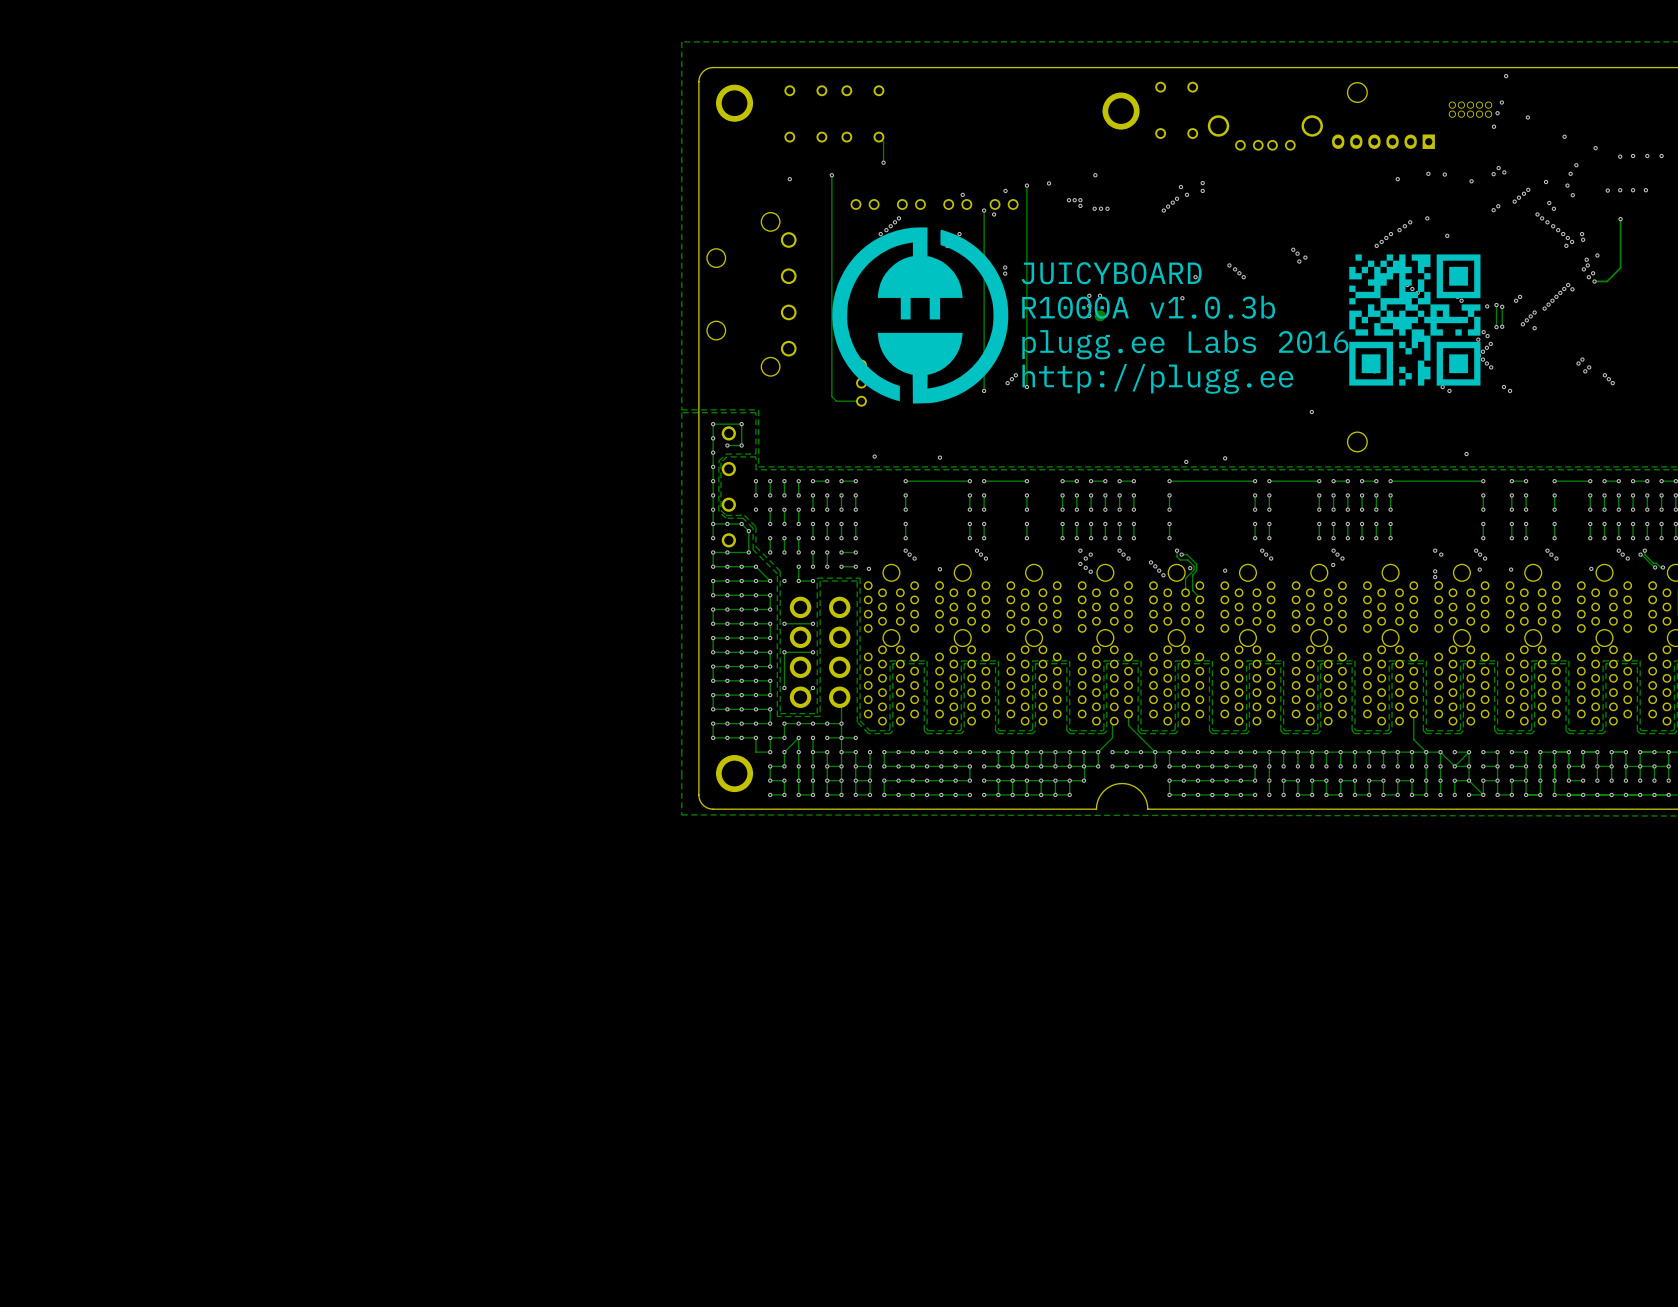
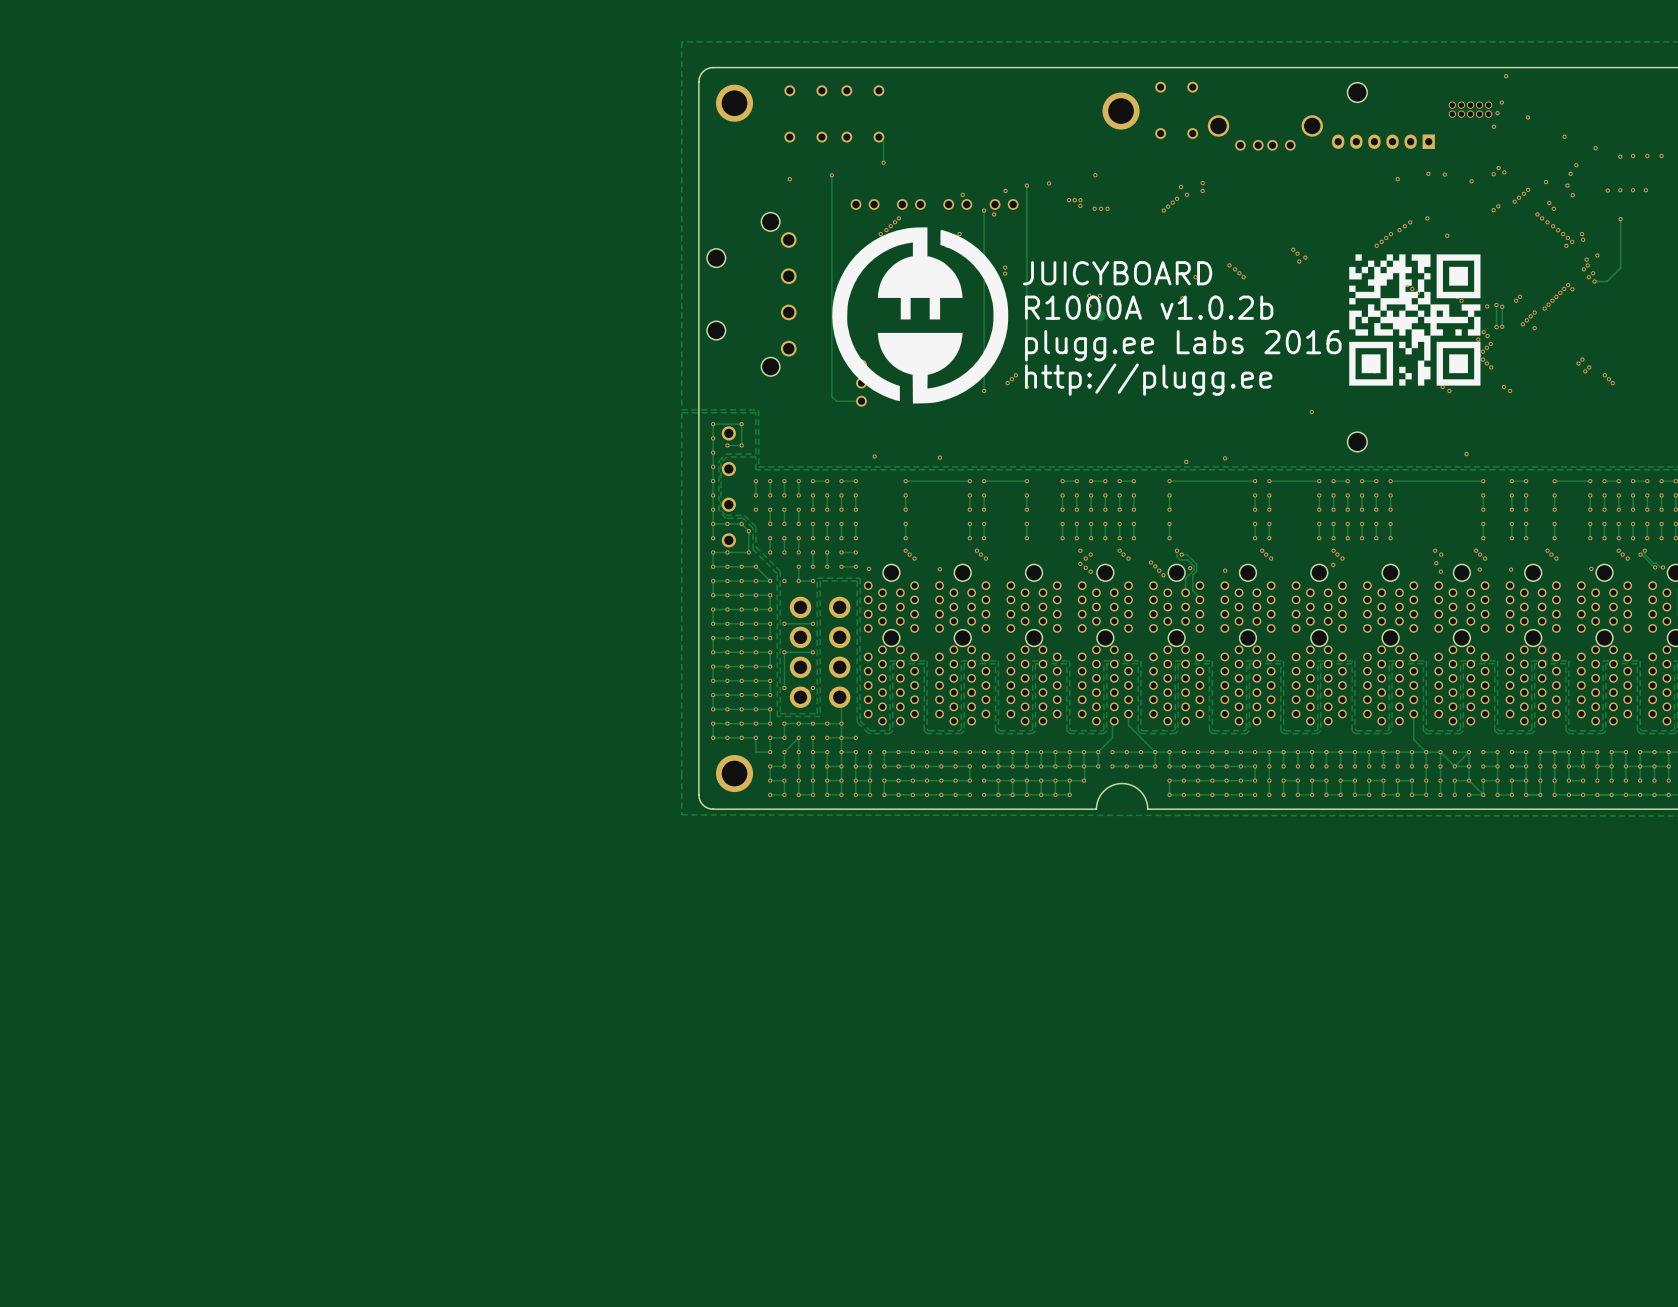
text: R1000A v1.0.3b (1148, 307) -> R1000A v1.0.2b (1149, 307)
via: none -> (1436, 563)
via: (1435, 571) -> none
via: none -> (1440, 571)
via: (1435, 577) -> none

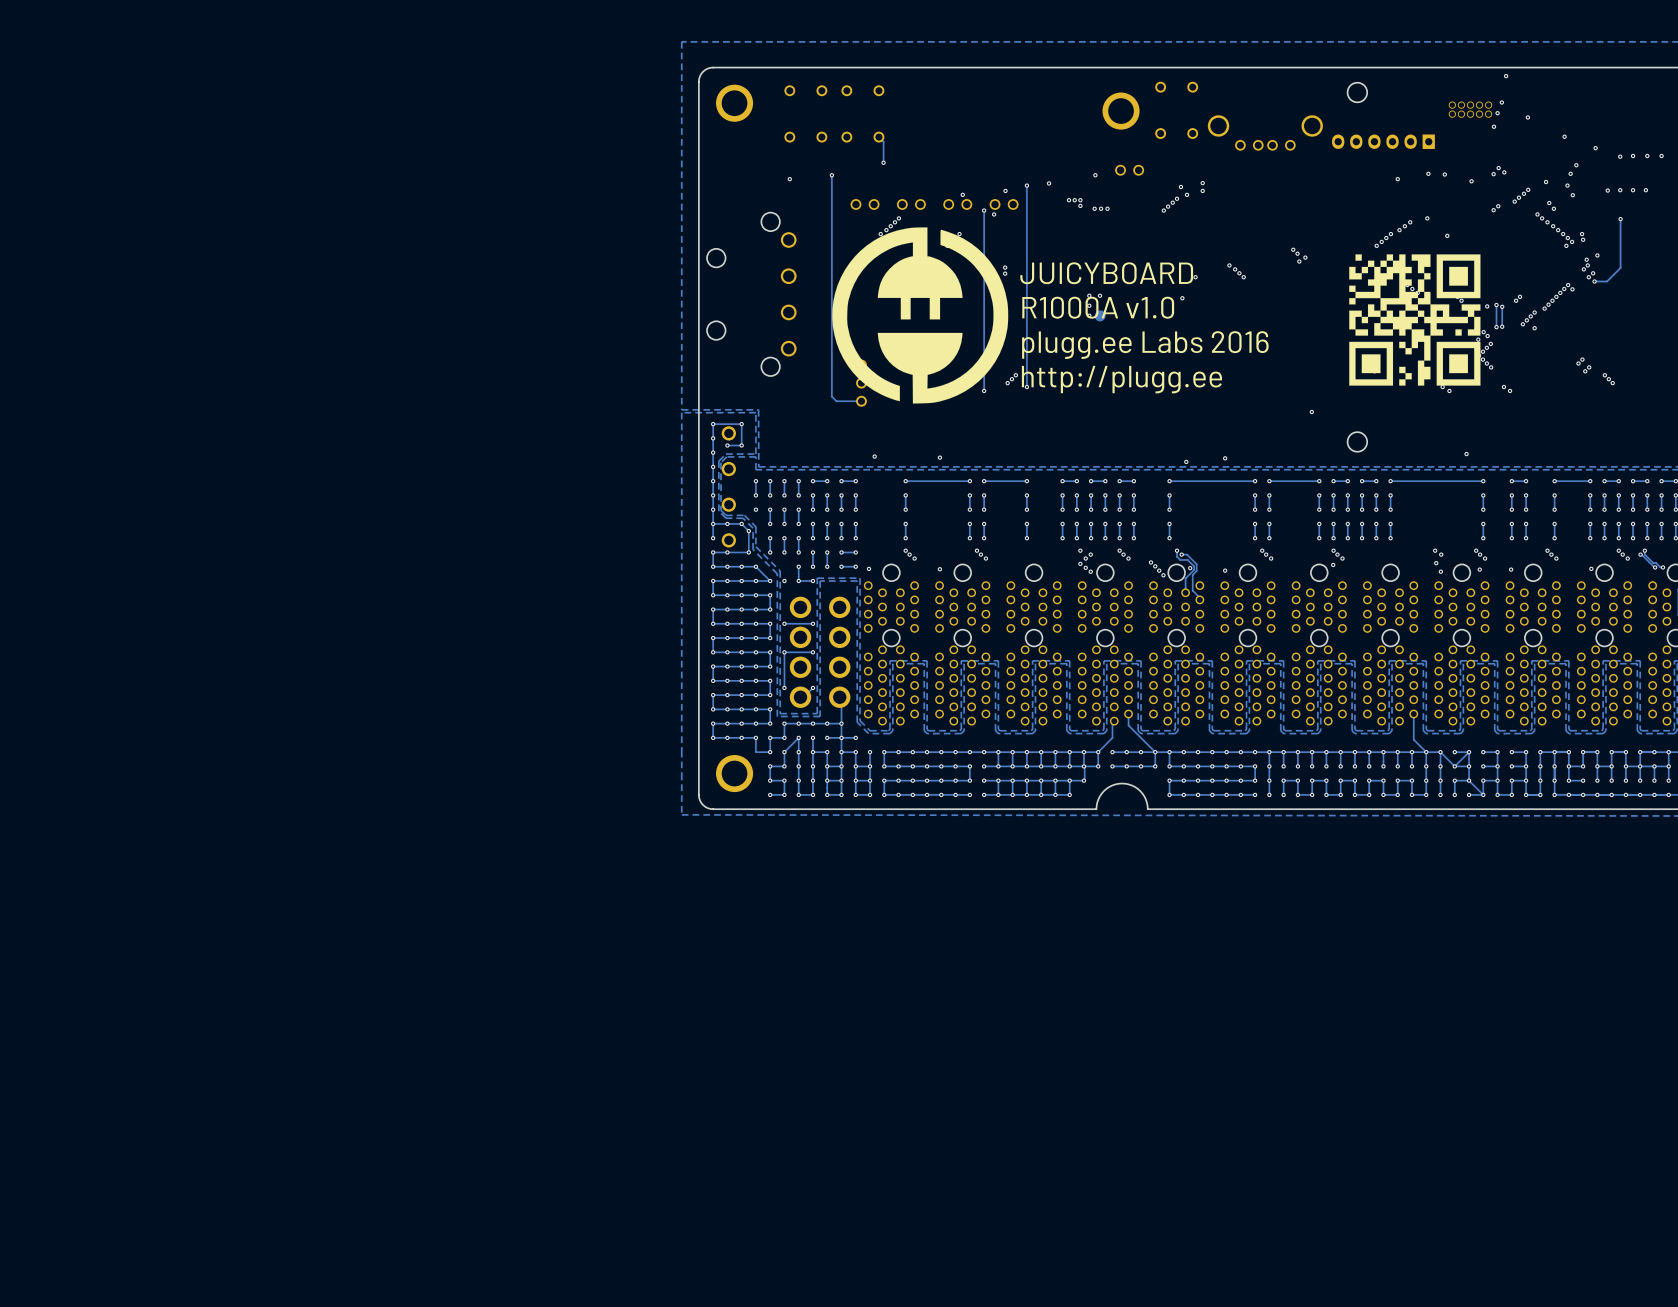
part: none -> (1129, 170)
text: R1000A v1.0.2b (1149, 307) -> R1000A v1.0 (1098, 307)

